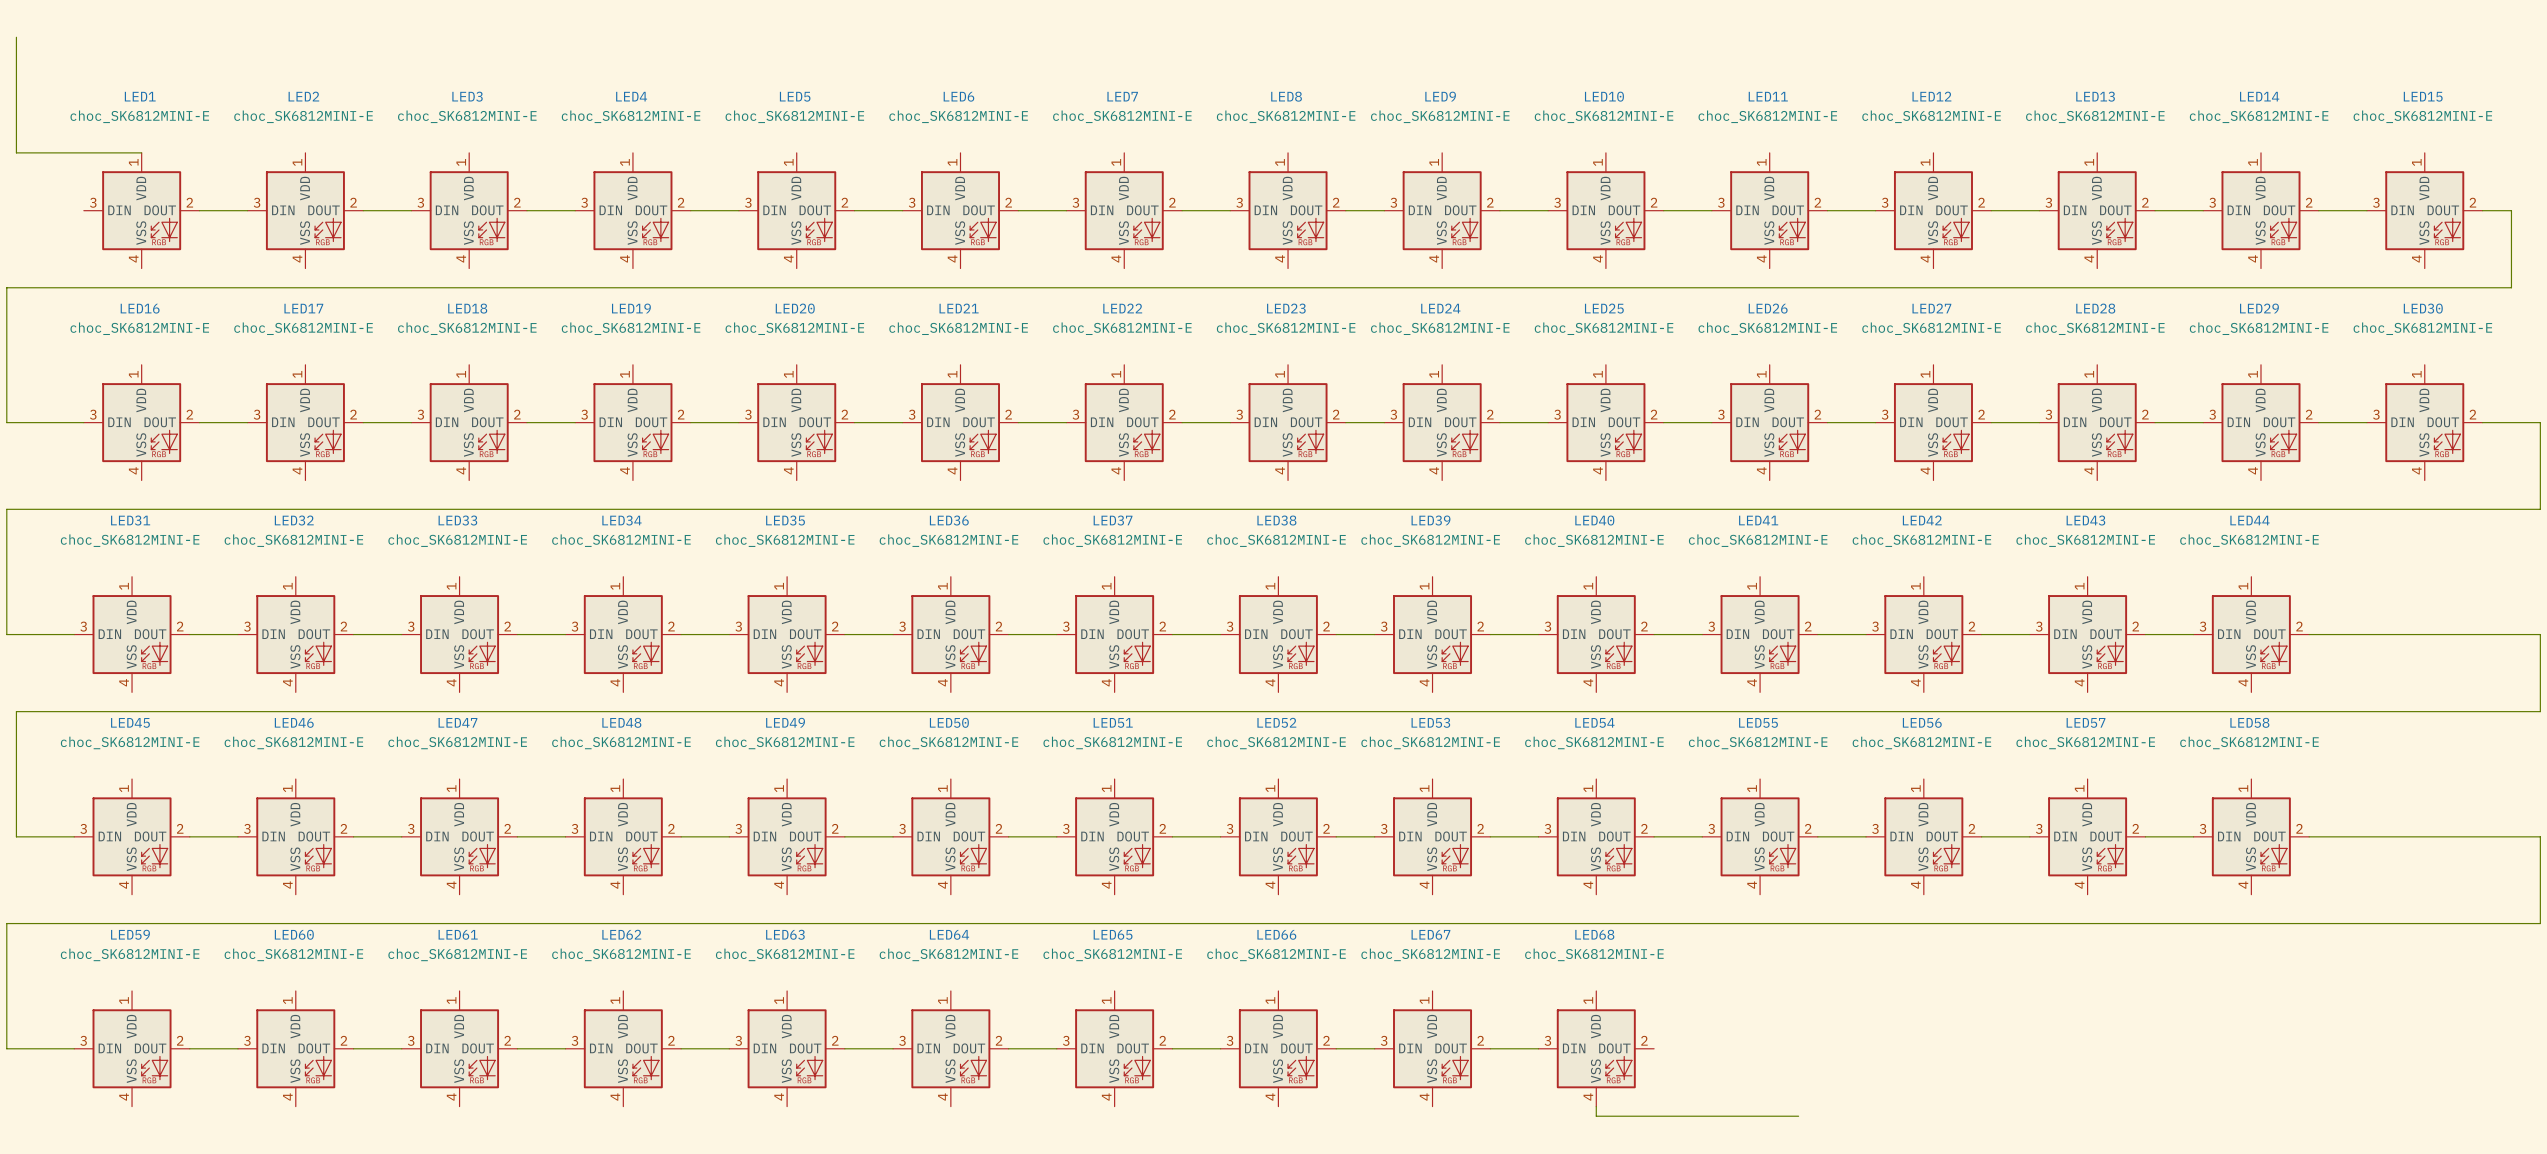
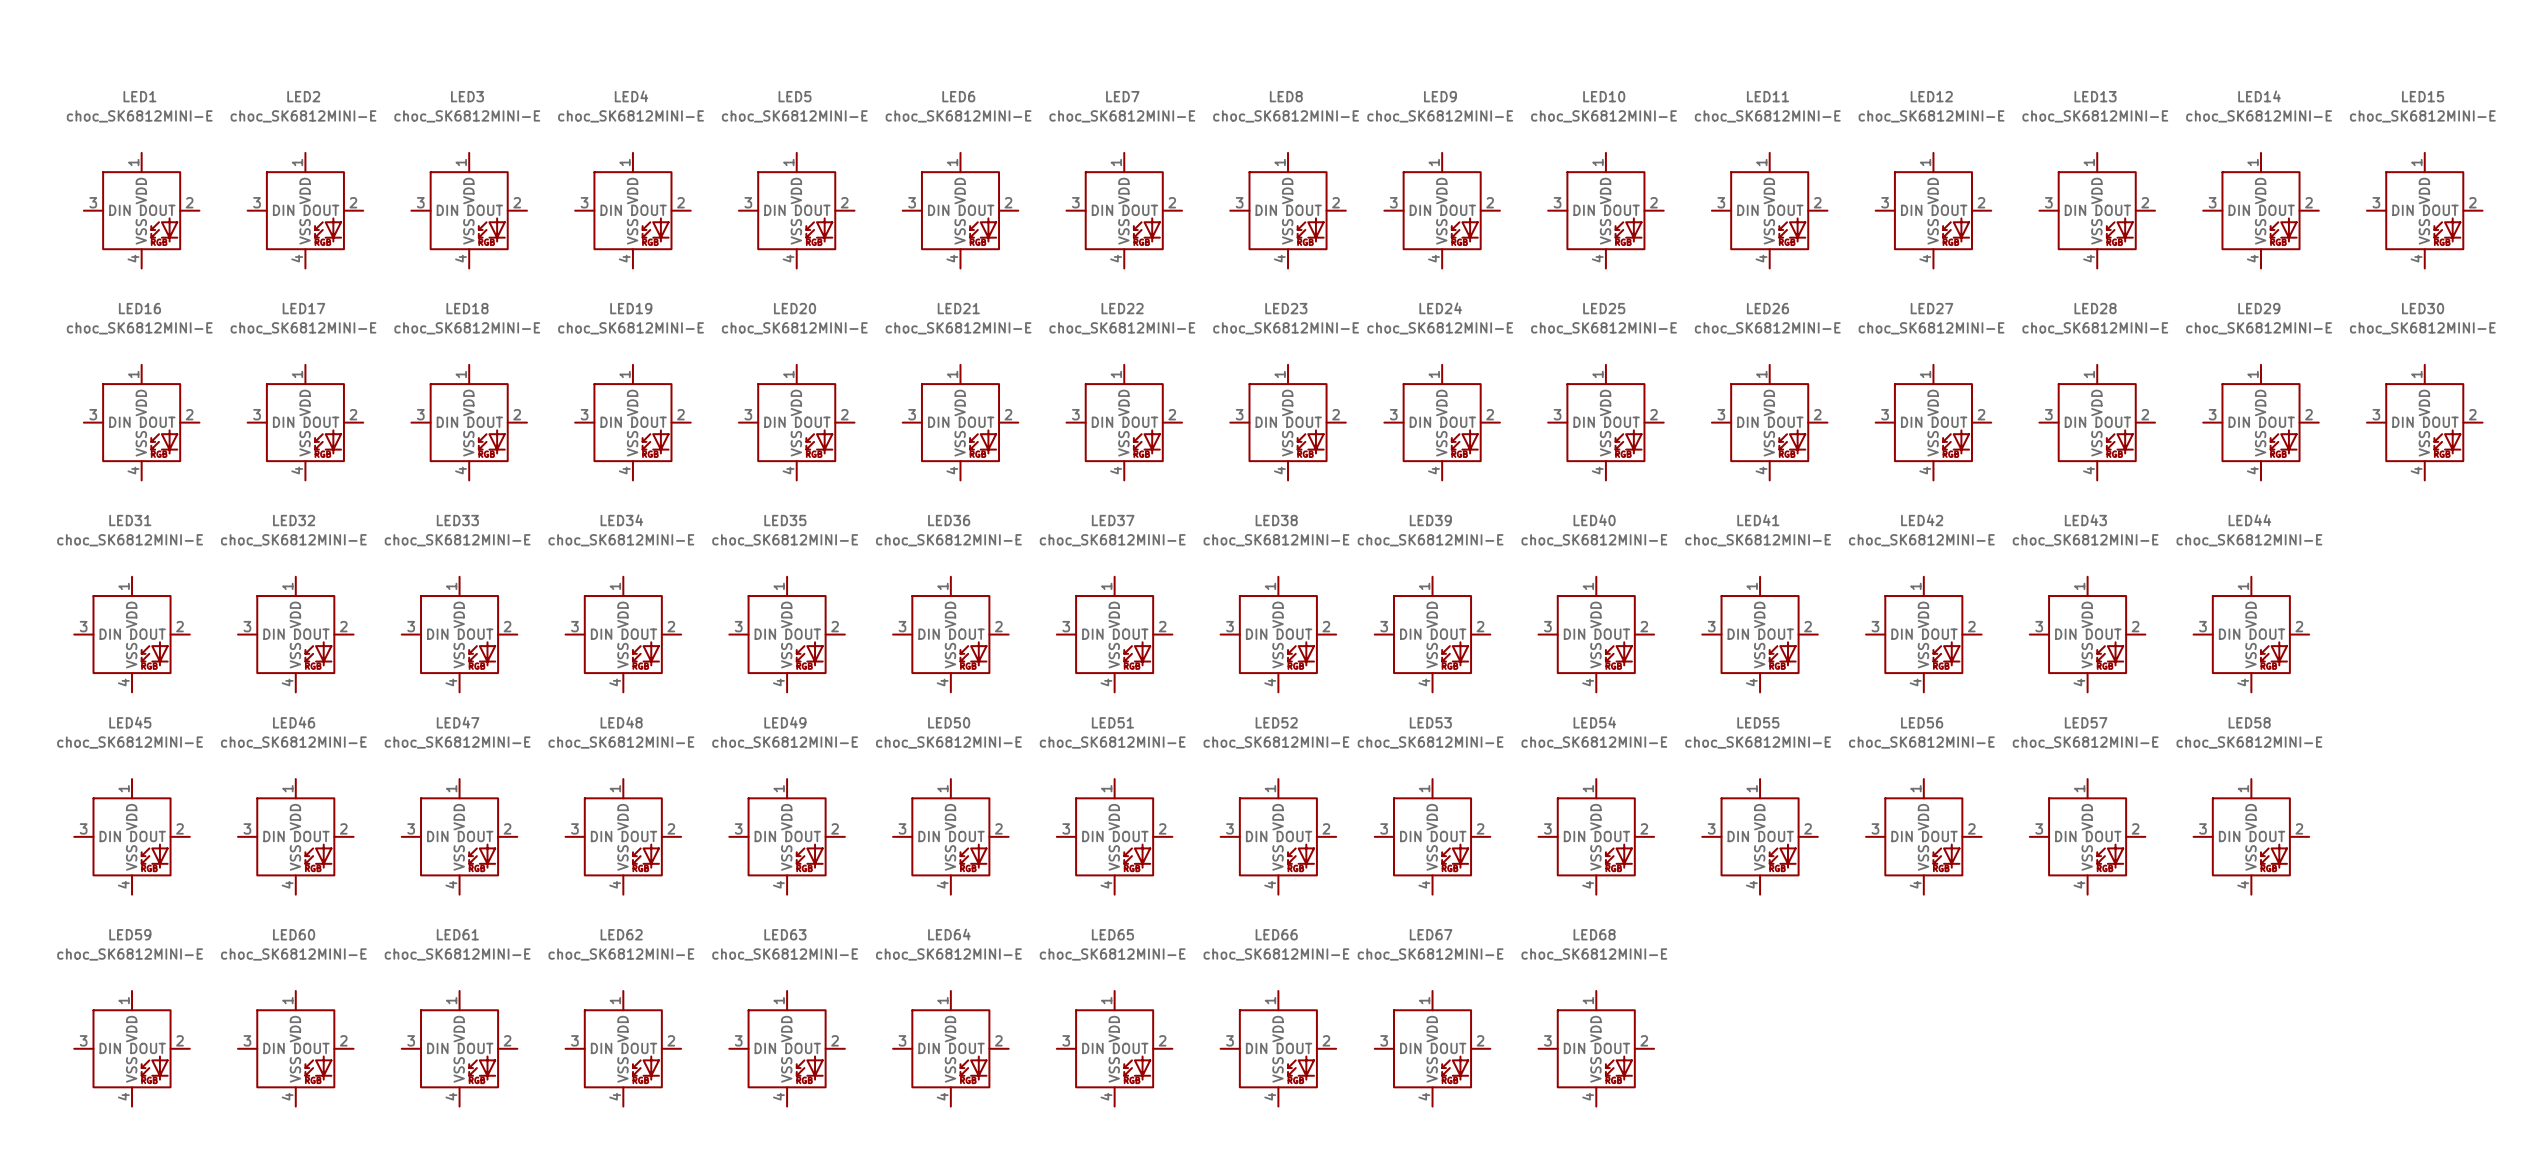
wire: (16, 37) (16, 152) (141, 152) -> none
wire: (199, 210) (247, 210) -> none
wire: (363, 210) (411, 210) -> none
wire: (526, 210) (575, 210) -> none
wire: (690, 210) (738, 210) -> none
wire: (854, 210) (902, 210) -> none
wire: (1018, 210) (1066, 210) -> none
wire: (1182, 210) (1230, 210) -> none
wire: (1345, 210) (1384, 210) -> none
wire: (1499, 210) (1548, 210) -> none
wire: (1663, 210) (1711, 210) -> none
wire: (1827, 210) (1875, 210) -> none
wire: (1991, 210) (2039, 210) -> none
wire: (2155, 210) (2203, 210) -> none
wire: (2318, 210) (2366, 210) -> none
wire: (2482, 210) (2511, 210) (2511, 287) (6, 287) (6, 422) (83, 422) -> none
wire: (199, 422) (247, 422) -> none
wire: (363, 422) (411, 422) -> none
wire: (526, 422) (575, 422) -> none
wire: (690, 422) (738, 422) -> none
wire: (854, 422) (902, 422) -> none
wire: (1018, 422) (1066, 422) -> none
wire: (1182, 422) (1230, 422) -> none
wire: (1345, 422) (1384, 422) -> none
wire: (1499, 422) (1548, 422) -> none
wire: (1663, 422) (1711, 422) -> none
wire: (1827, 422) (1875, 422) -> none
wire: (1991, 422) (2039, 422) -> none
wire: (2155, 422) (2203, 422) -> none
wire: (2318, 422) (2366, 422) -> none
wire: (2482, 422) (2540, 422) (2540, 509) (6, 509) (6, 634) (74, 634) -> none
wire: (189, 634) (237, 634) -> none
wire: (353, 634) (401, 634) -> none
wire: (517, 634) (565, 634) -> none
wire: (681, 634) (729, 634) -> none
wire: (844, 634) (893, 634) -> none
wire: (1008, 634) (1056, 634) -> none
wire: (1172, 634) (1220, 634) -> none
wire: (1336, 634) (1374, 634) -> none
wire: (1490, 634) (1538, 634) -> none
wire: (1654, 634) (1702, 634) -> none
wire: (1817, 634) (1866, 634) -> none
wire: (1981, 634) (2029, 634) -> none
wire: (2145, 634) (2193, 634) -> none
wire: (2309, 634) (2540, 634) (2540, 711) (16, 711) (16, 836) (74, 836) -> none
wire: (189, 836) (237, 836) -> none
wire: (353, 836) (401, 836) -> none
wire: (517, 836) (565, 836) -> none
wire: (681, 836) (729, 836) -> none
wire: (844, 836) (893, 836) -> none
wire: (1008, 836) (1056, 836) -> none
wire: (1172, 836) (1220, 836) -> none
wire: (1336, 836) (1374, 836) -> none
wire: (1490, 836) (1538, 836) -> none
wire: (1654, 836) (1702, 836) -> none
wire: (1817, 836) (1866, 836) -> none
wire: (1981, 836) (2029, 836) -> none
wire: (2145, 836) (2193, 836) -> none
wire: (2309, 836) (2540, 836) (2540, 923) (6, 923) (6, 1048) (74, 1048) -> none
wire: (189, 1048) (237, 1048) -> none
wire: (353, 1048) (401, 1048) -> none
wire: (517, 1048) (565, 1048) -> none
wire: (681, 1048) (729, 1048) -> none
wire: (844, 1048) (893, 1048) -> none
wire: (1008, 1048) (1056, 1048) -> none
wire: (1172, 1048) (1220, 1048) -> none
wire: (1336, 1048) (1374, 1048) -> none
wire: (1490, 1048) (1538, 1048) -> none
wire: (1596, 1106) (1596, 1116) (1798, 1116) -> none

